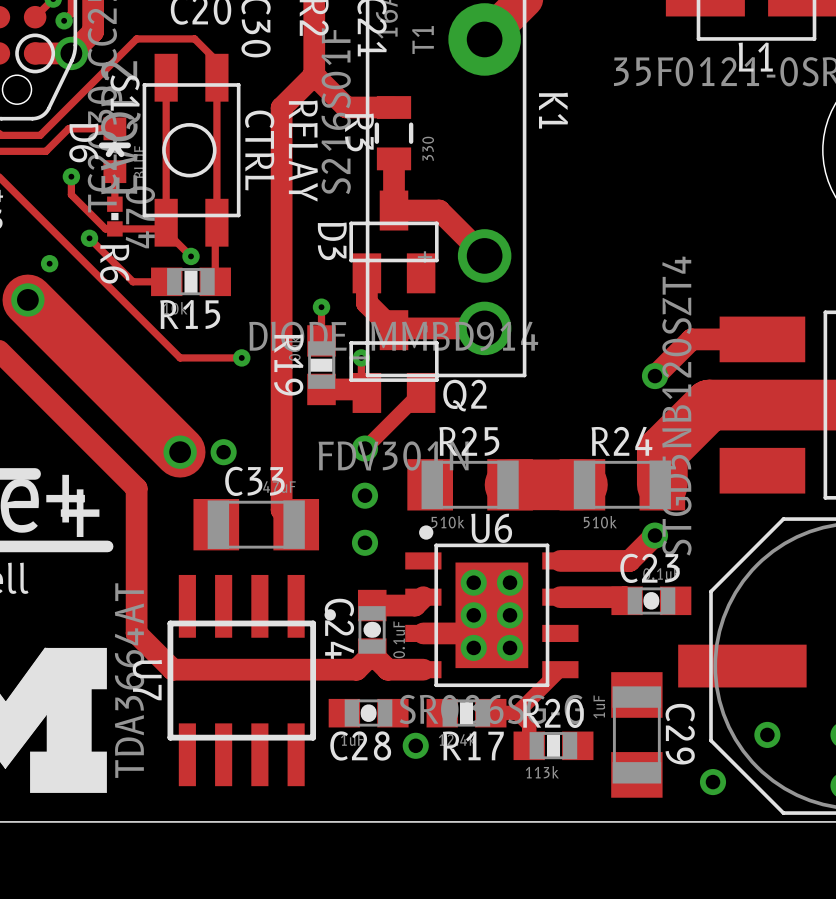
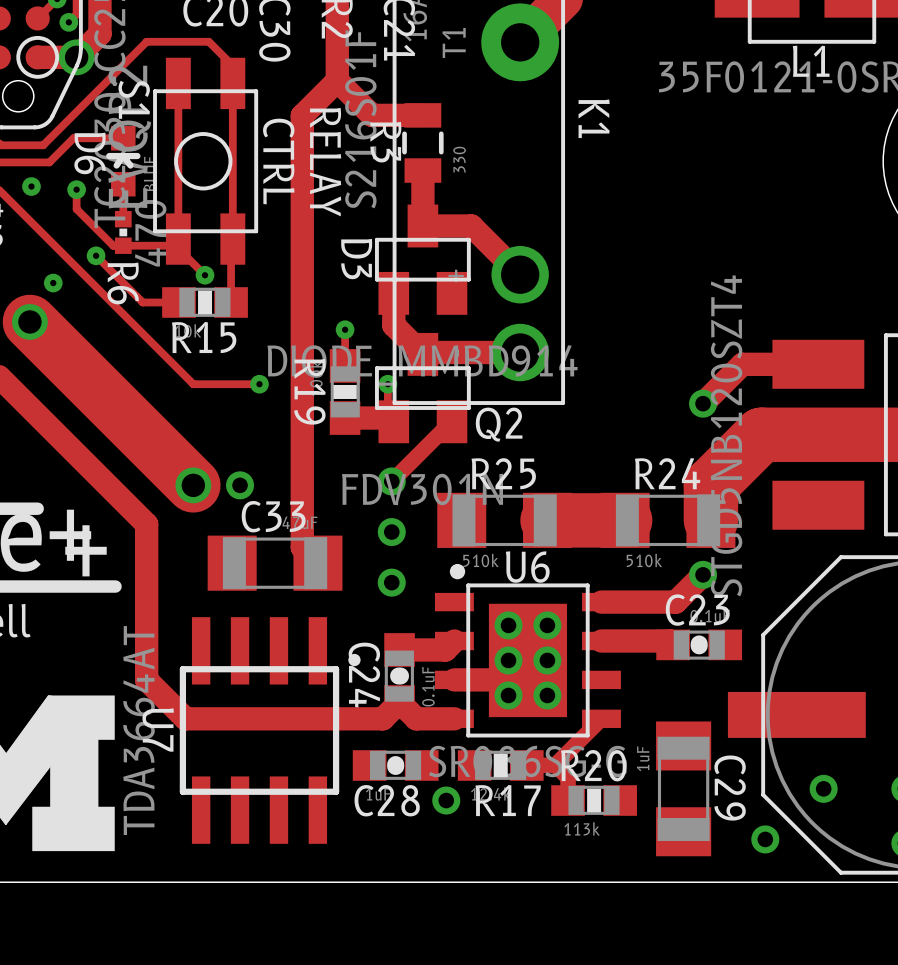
via: none -> (31, 186)

